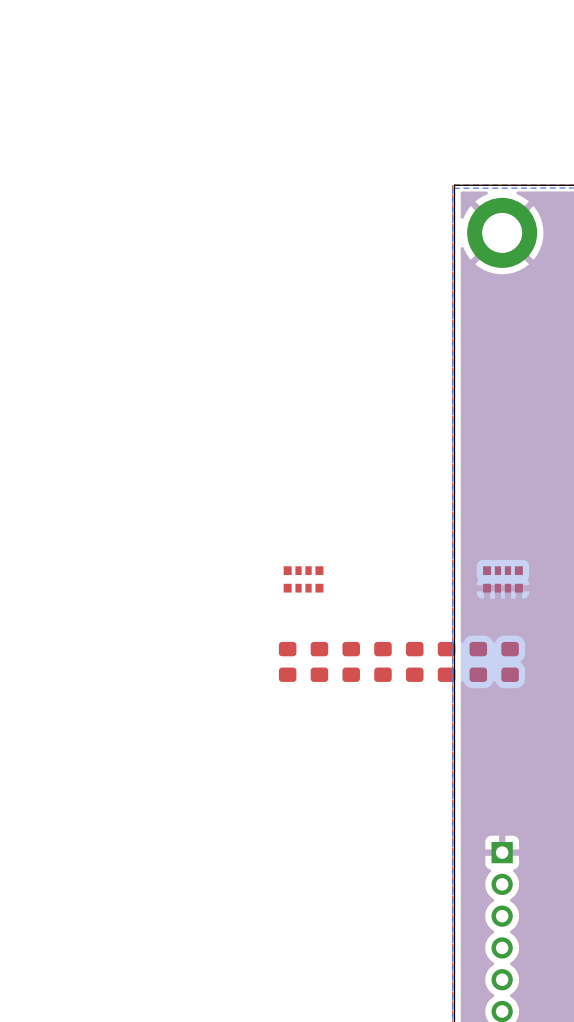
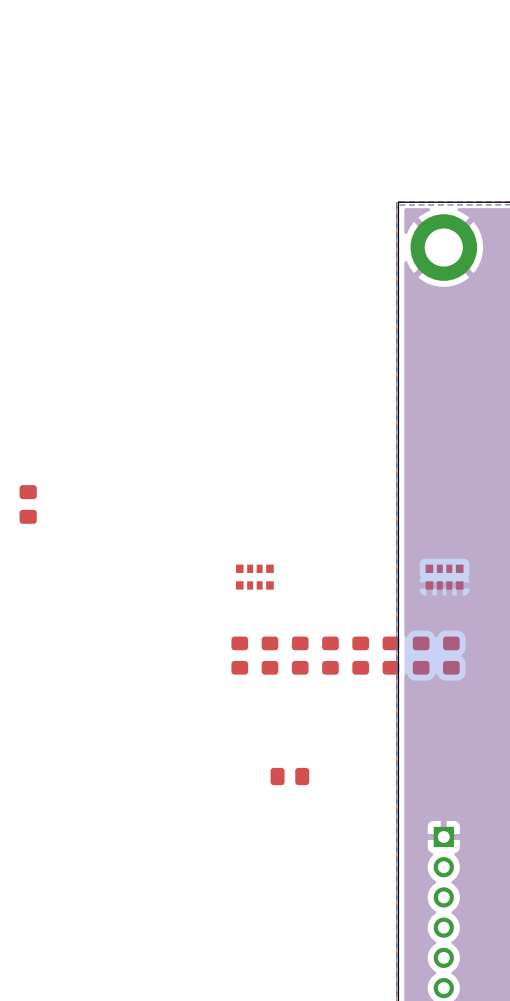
part: none -> (28, 504)
part: none -> (289, 776)

